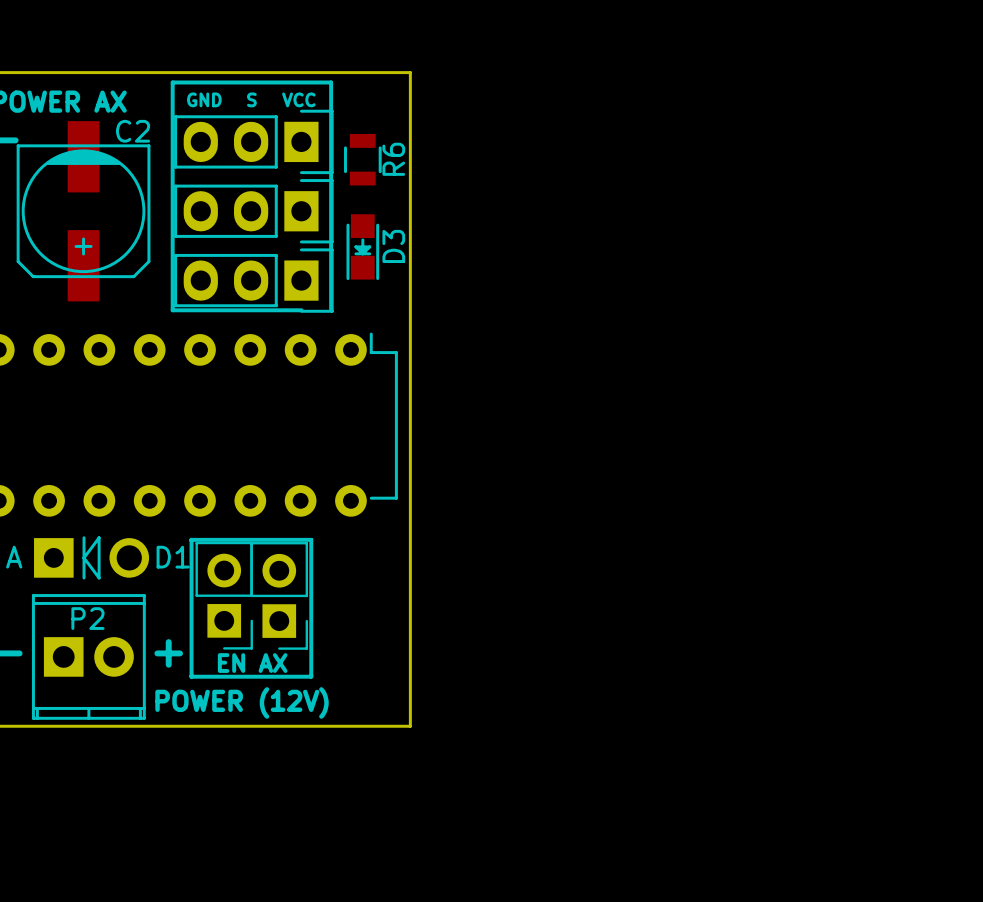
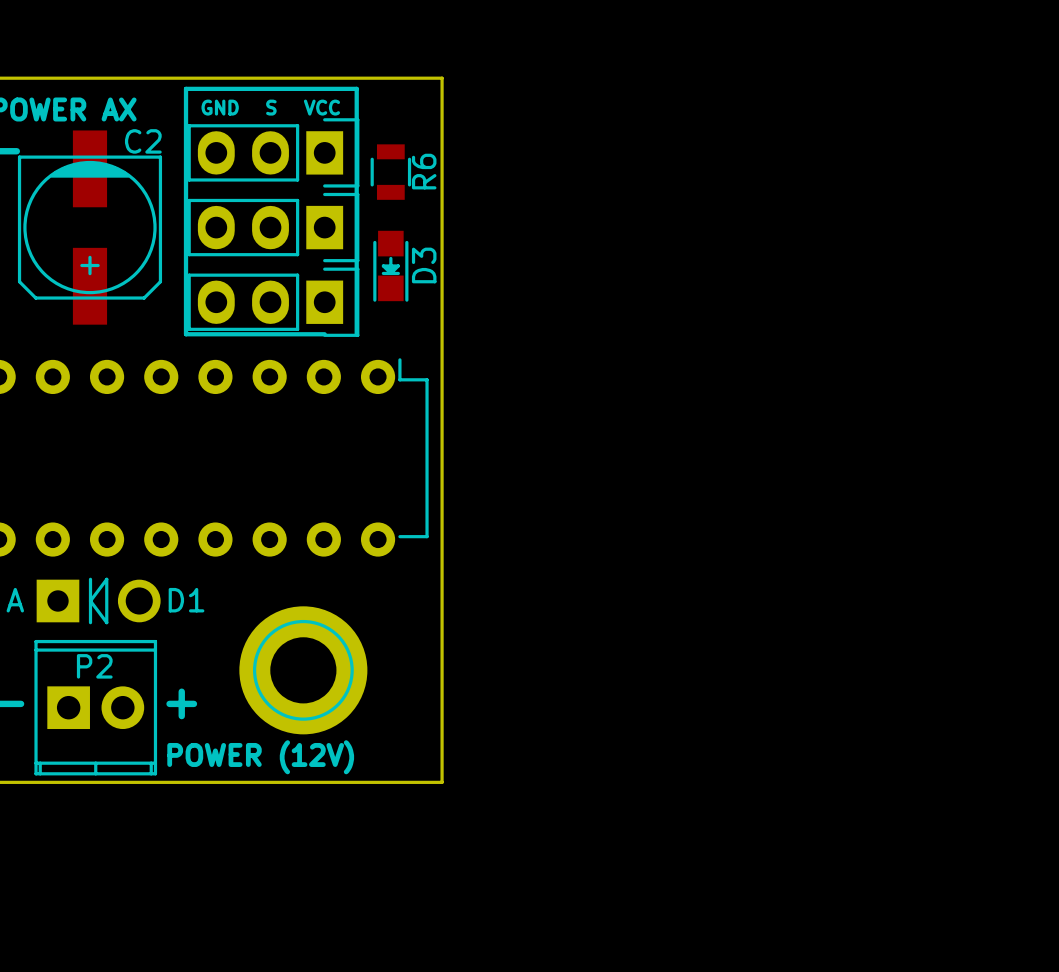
line: (191, 539) (191, 676) (311, 676) (311, 539) (191, 539) -> none
part: (224, 595) -> none
part: (279, 595) -> none
part: none -> (303, 670)
text: EN AX (252, 663) -> none

